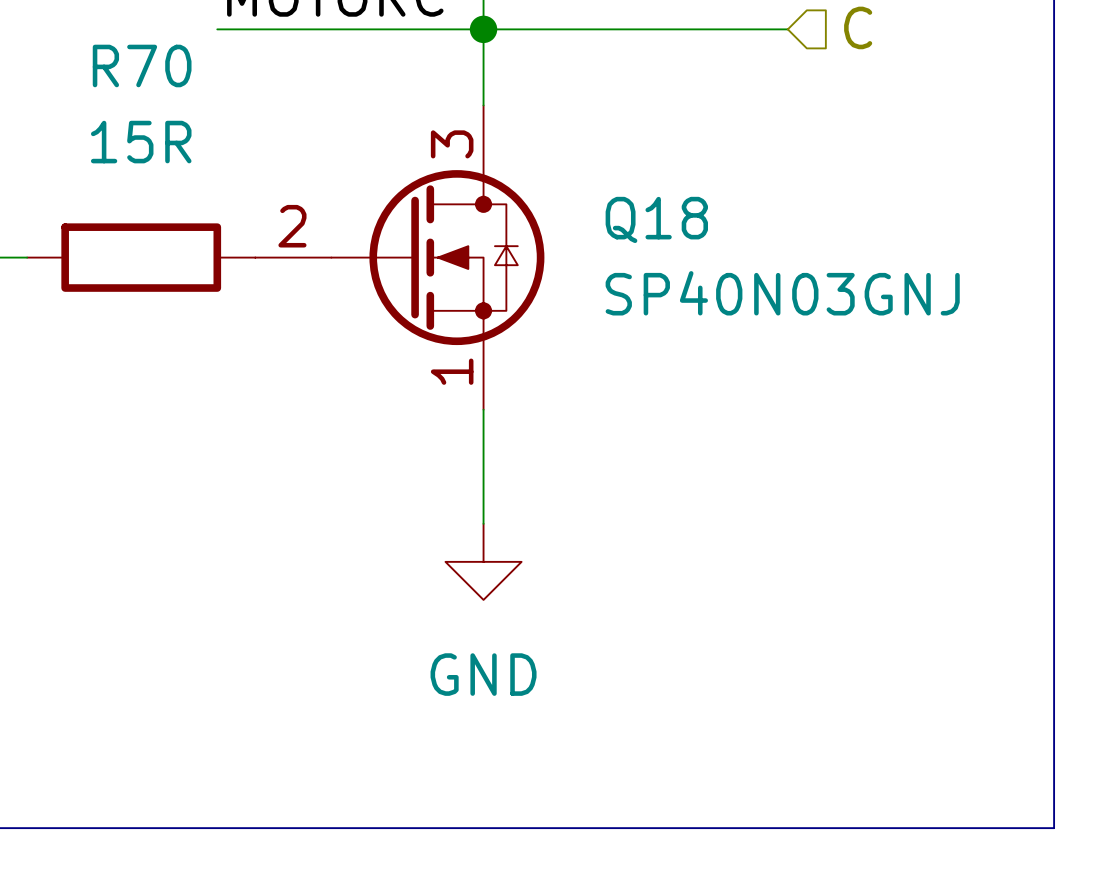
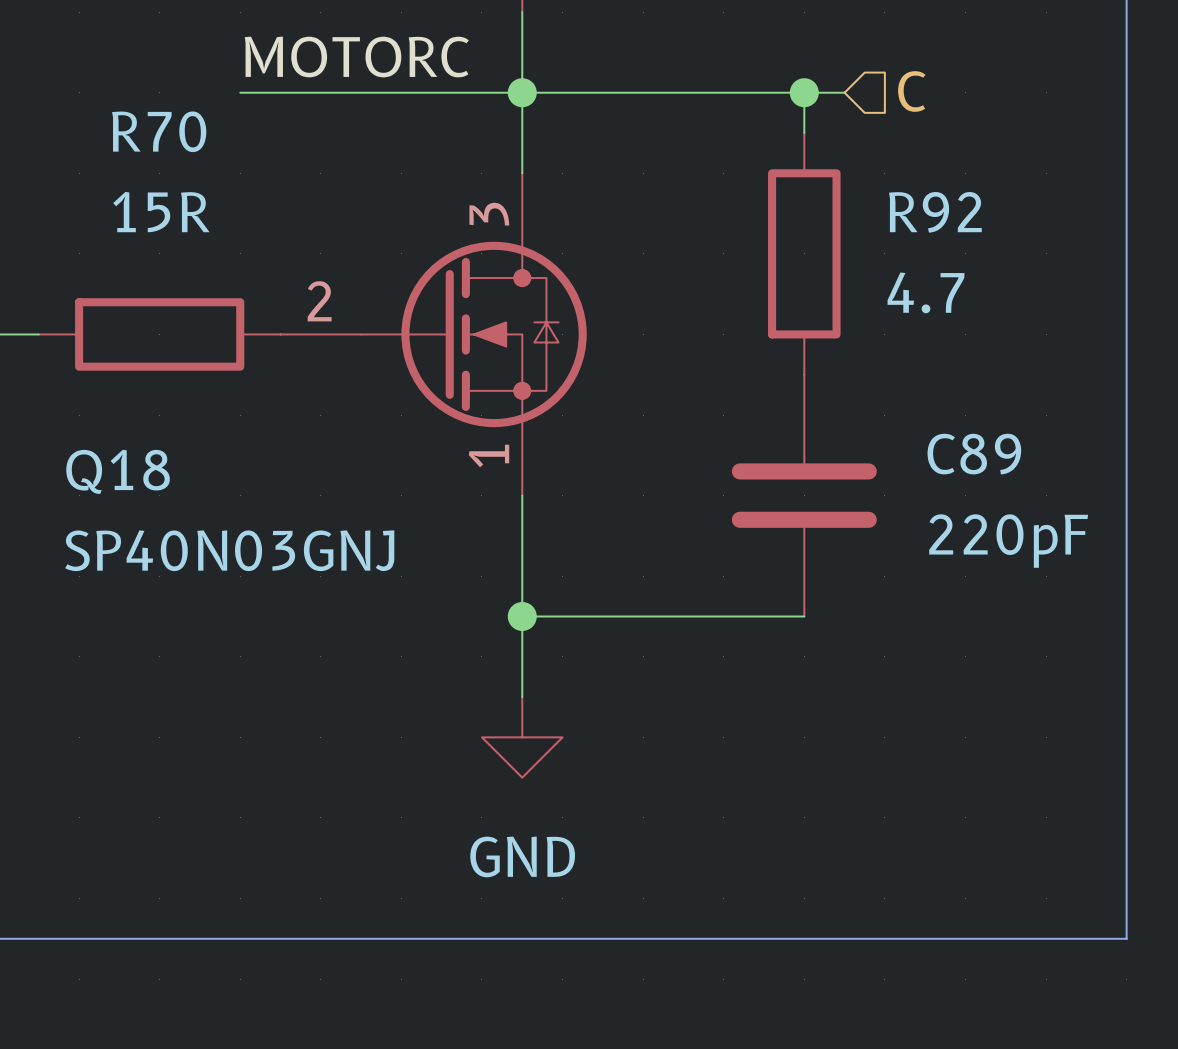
wire: none -> (804, 92) (804, 133)
junction: none -> (804, 92)
R92: none -> 4.7 (804, 253)
Q18 name position: Q18 (656, 219) -> Q18 (118, 471)
Q18 value position: SP40N03GNJ (782, 293) -> SP40N03GNJ (229, 550)
C89: none -> 220pF (804, 495)
junction: none -> (522, 616)
wire: none -> (804, 616) (522, 616) (522, 697)
power symbol position: GND (483, 561) -> GND (522, 737)

